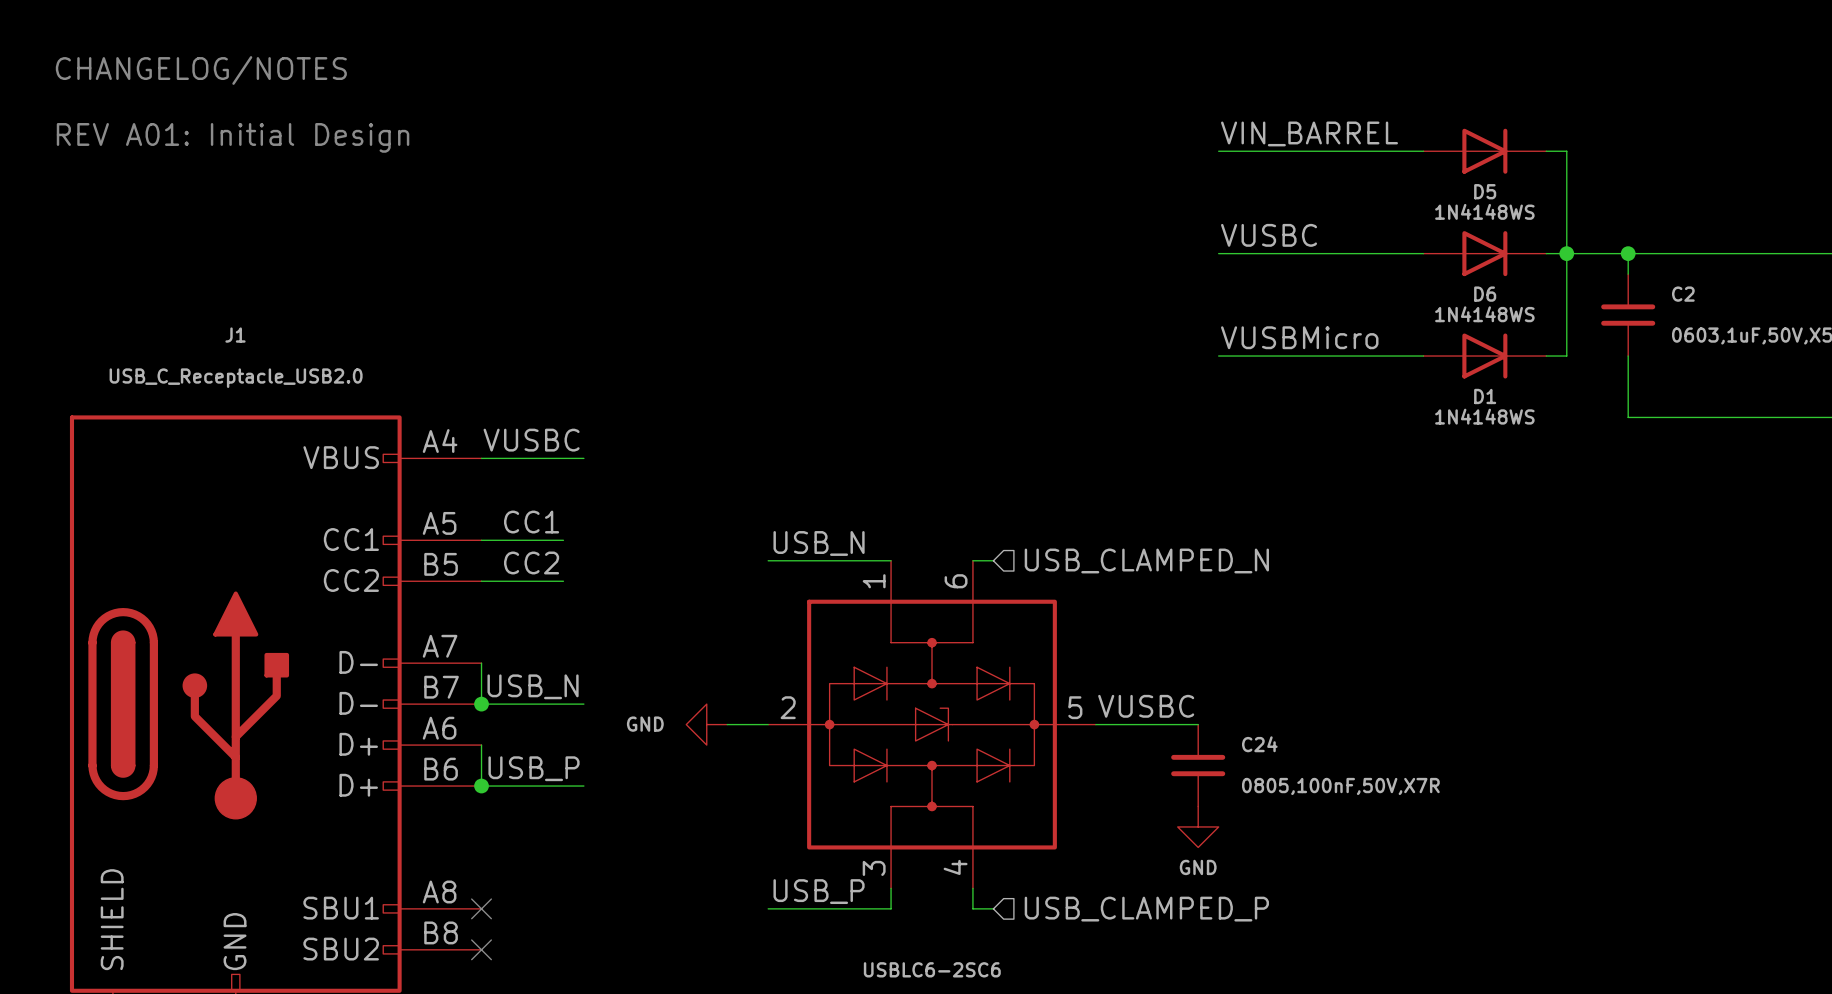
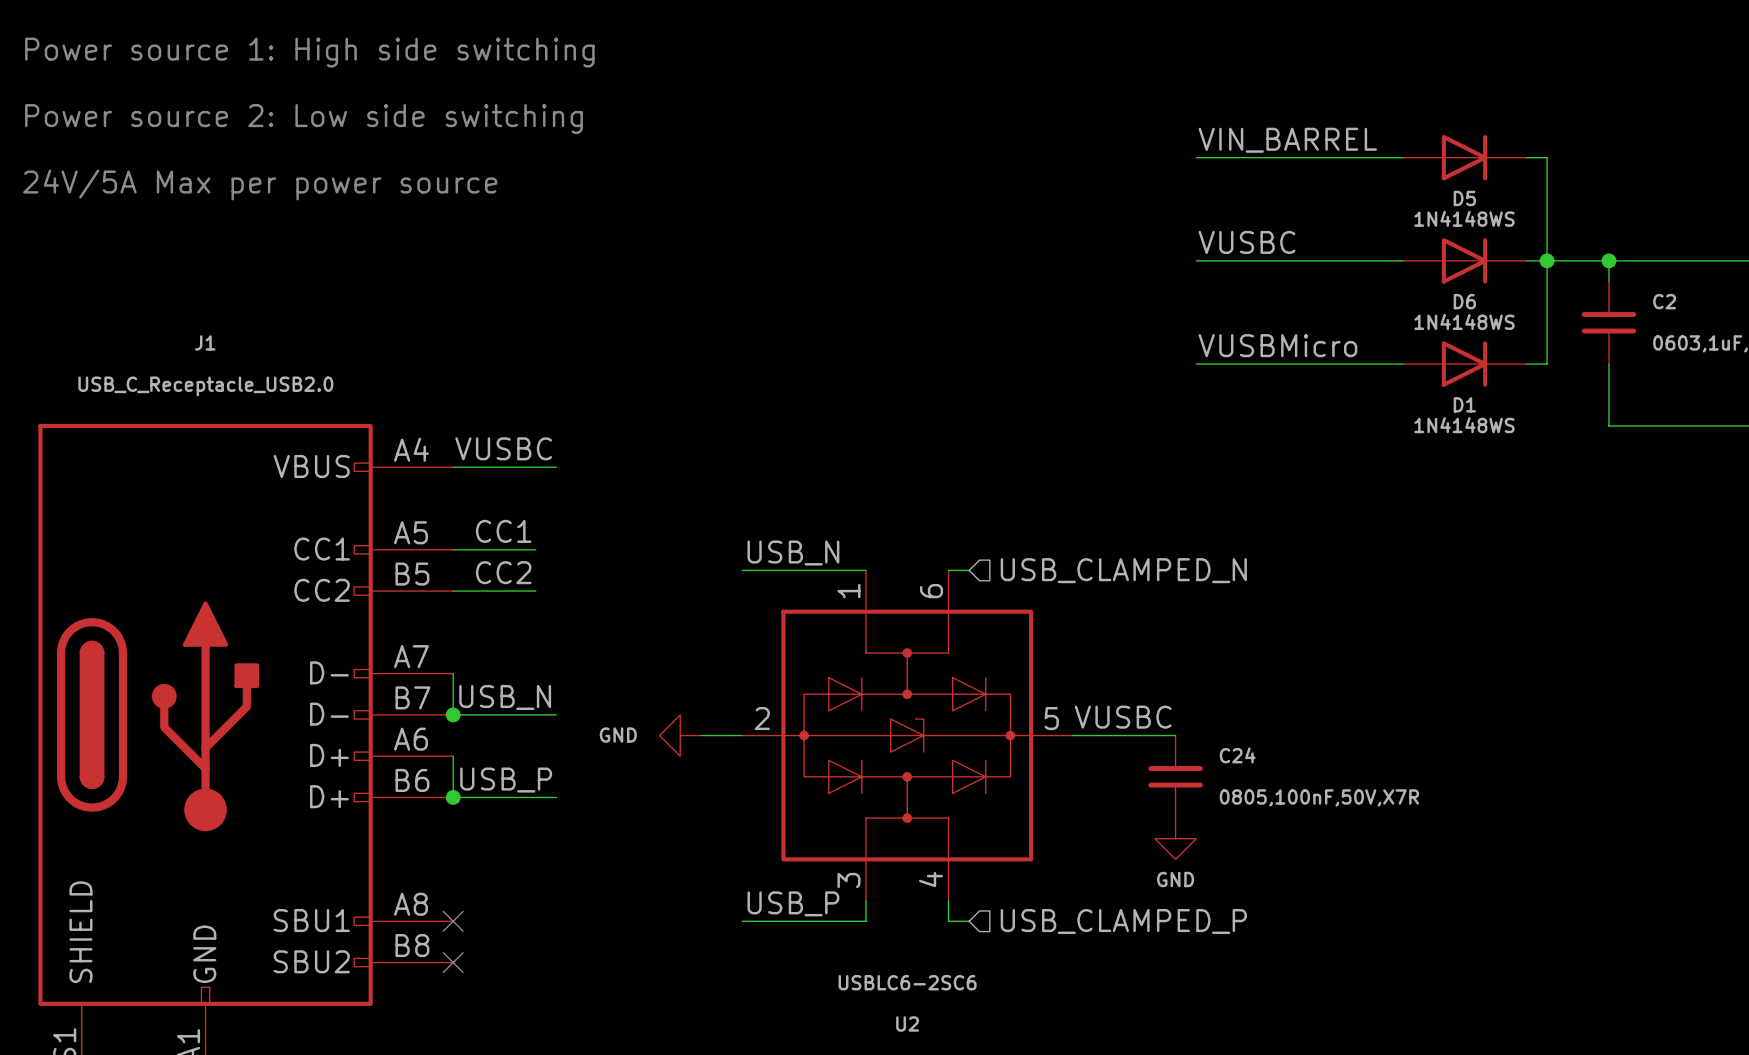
text: none -> Power source 1: High side switching (309, 52)
text: CHANGELOG/NOTES (201, 70) -> none
text: none -> Power source 2: Low side switching (303, 119)
text: REV A01: Initial Design (233, 137) -> none
text: none -> 24V/5A Max per power source (260, 184)

